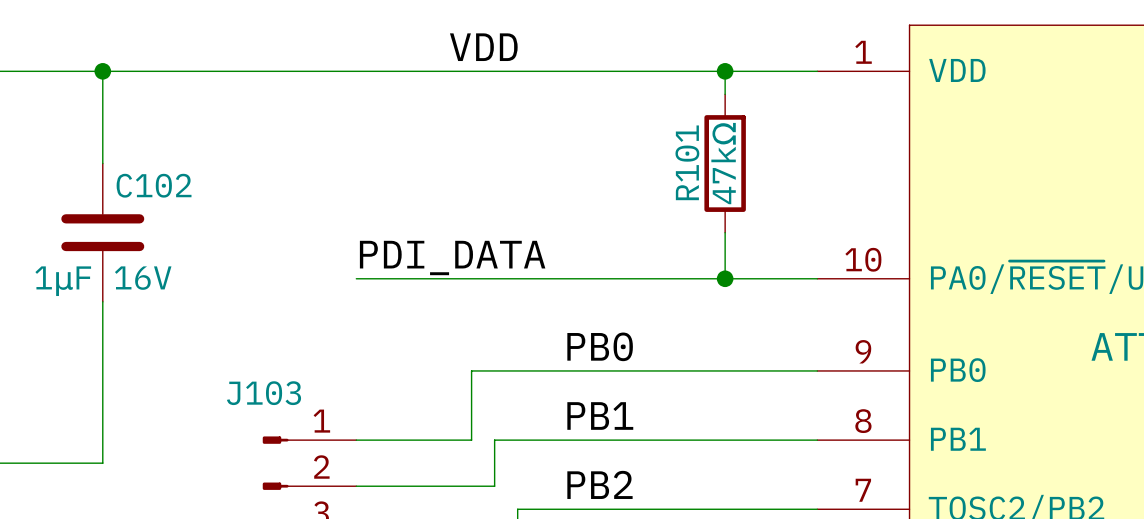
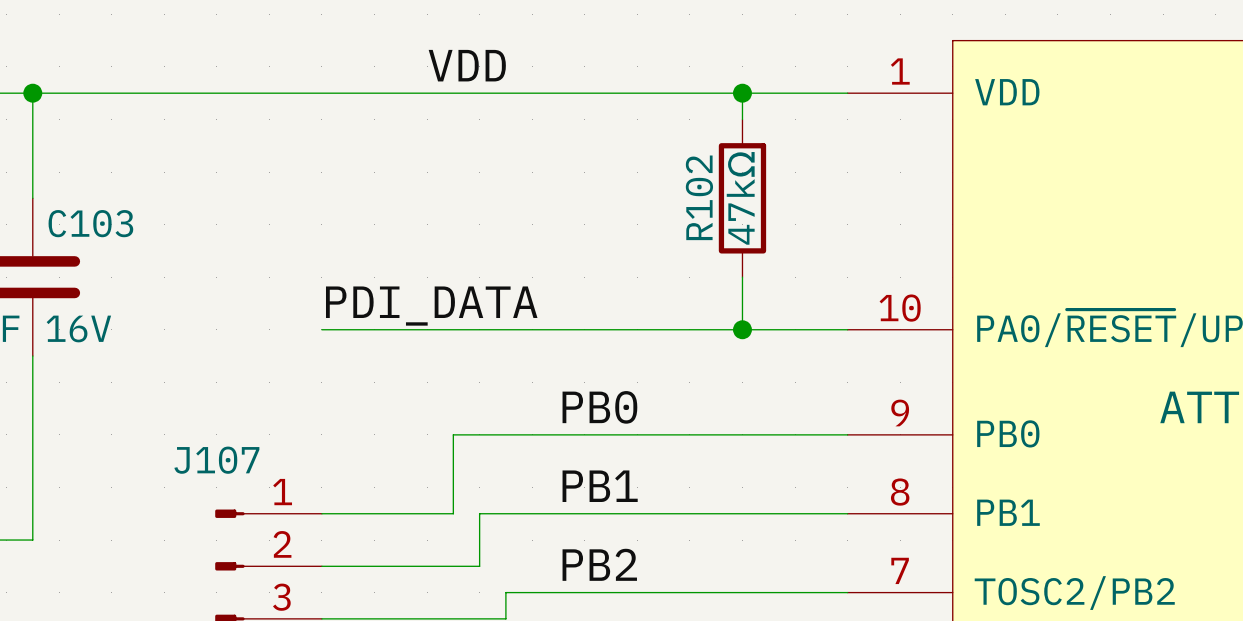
R101 name: R101 (687, 162) -> R102 (699, 197)
C102 name: C102 (154, 185) -> C103 (90, 223)
J103 name: J103 (264, 393) -> J107 (216, 460)

